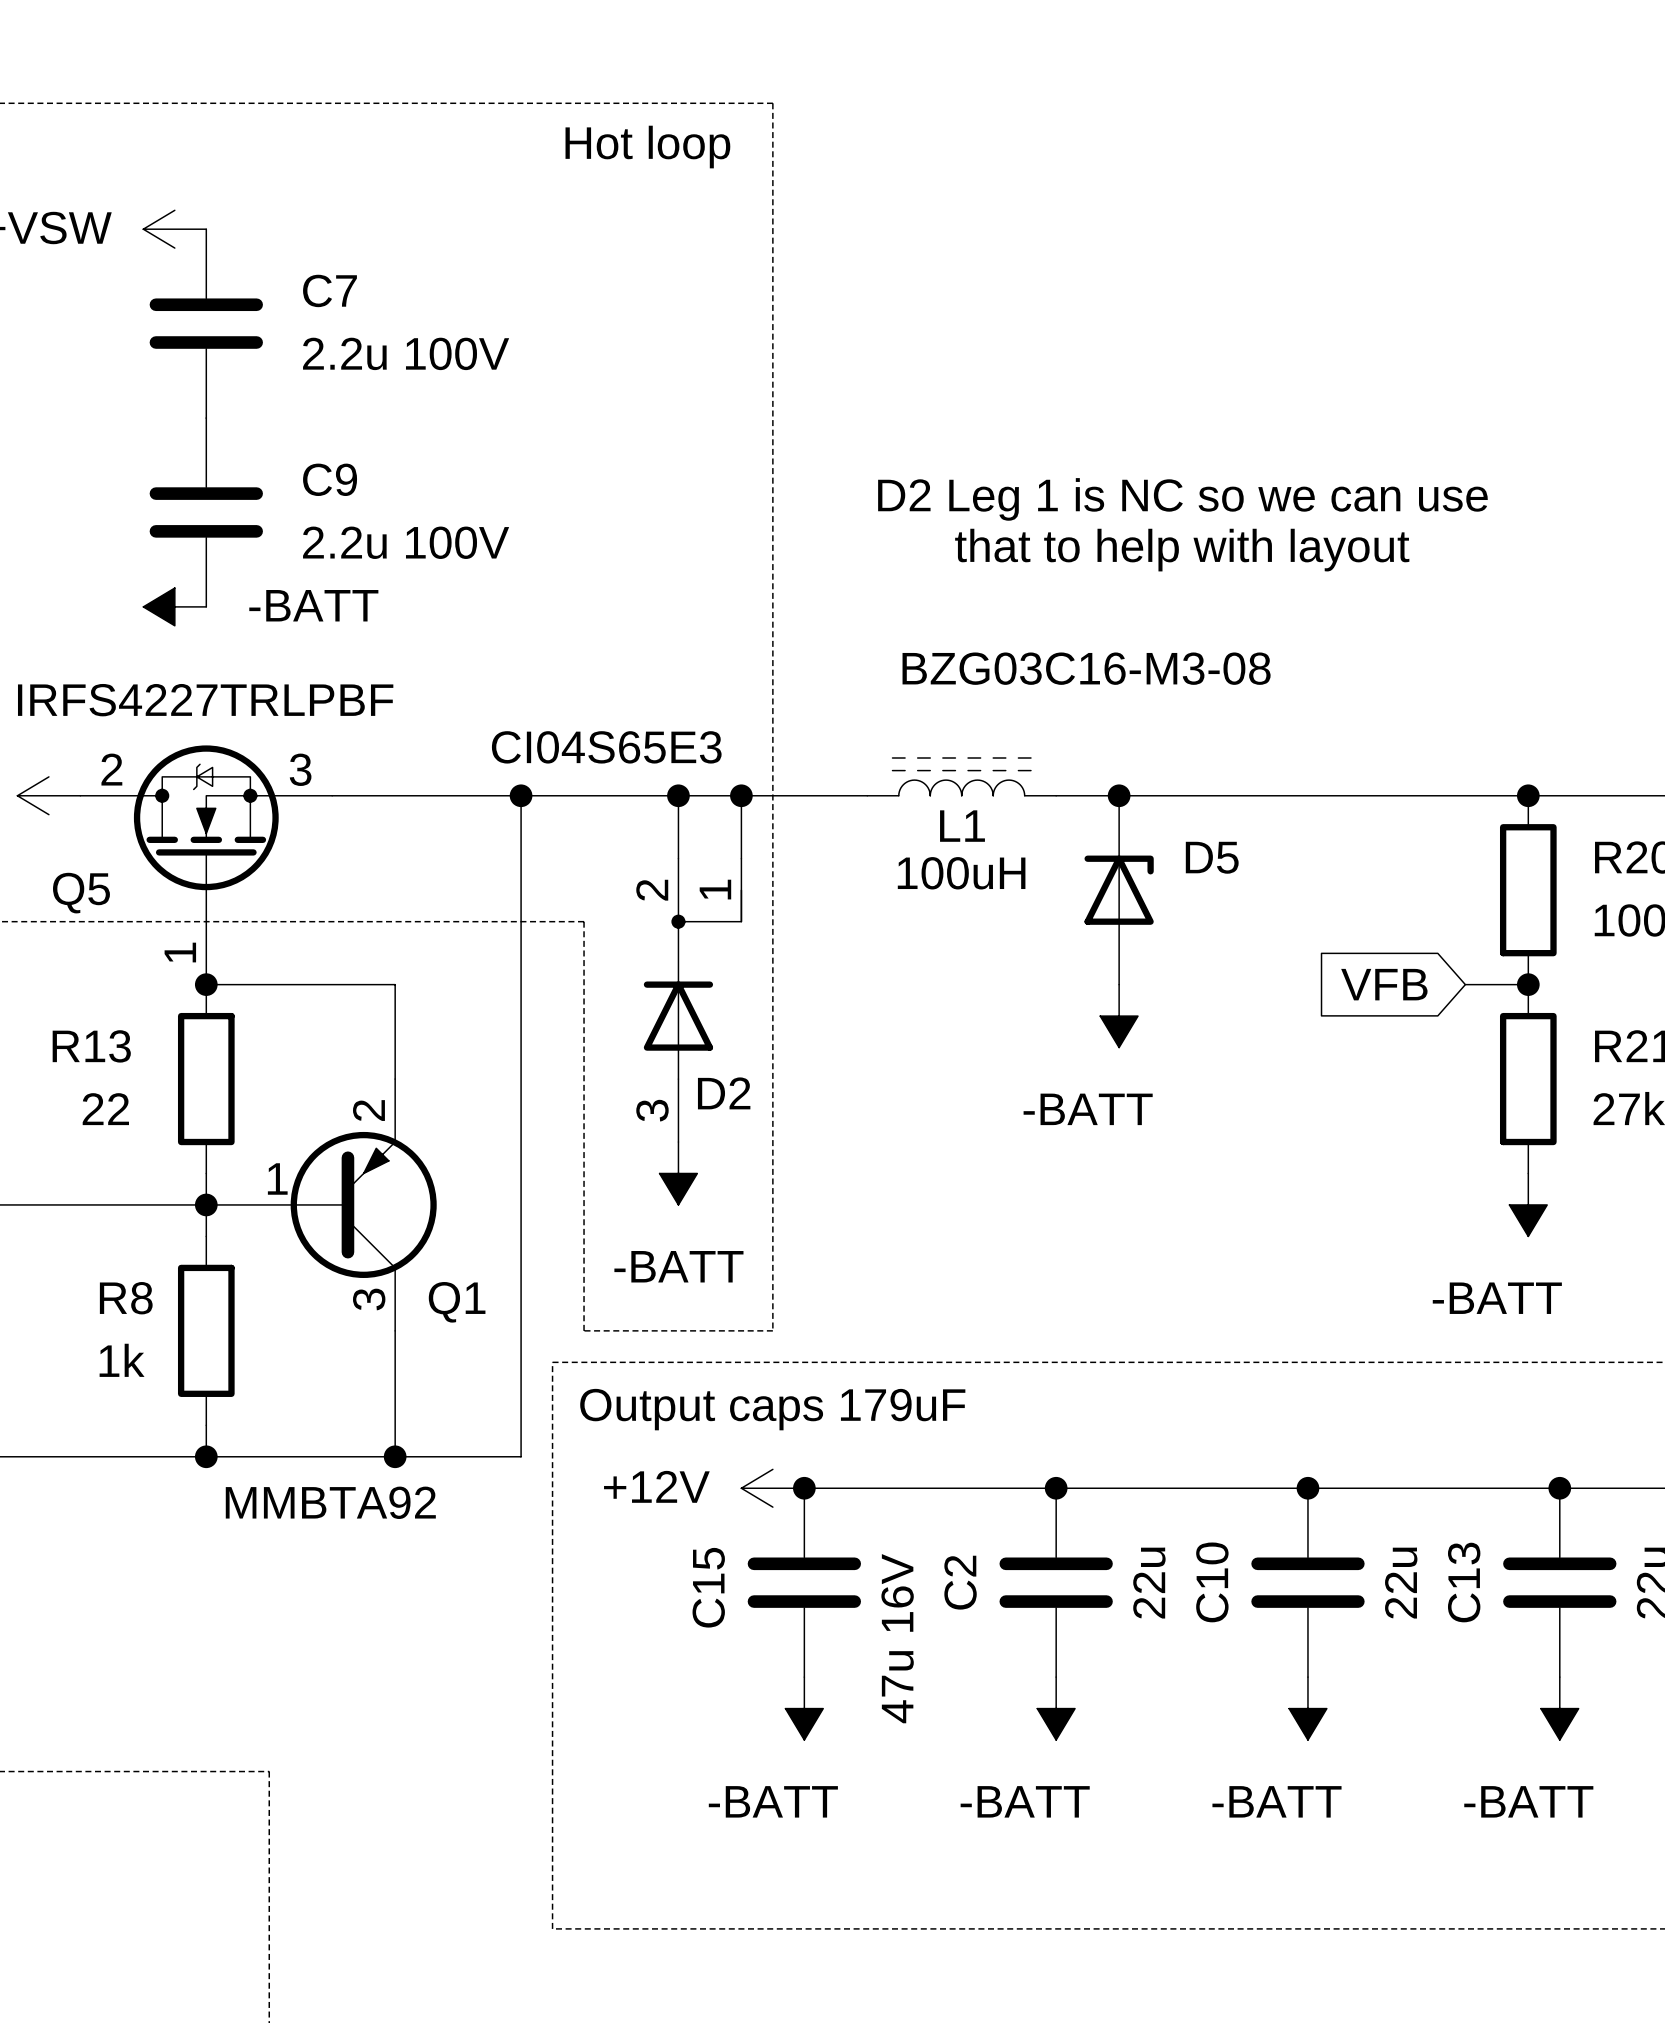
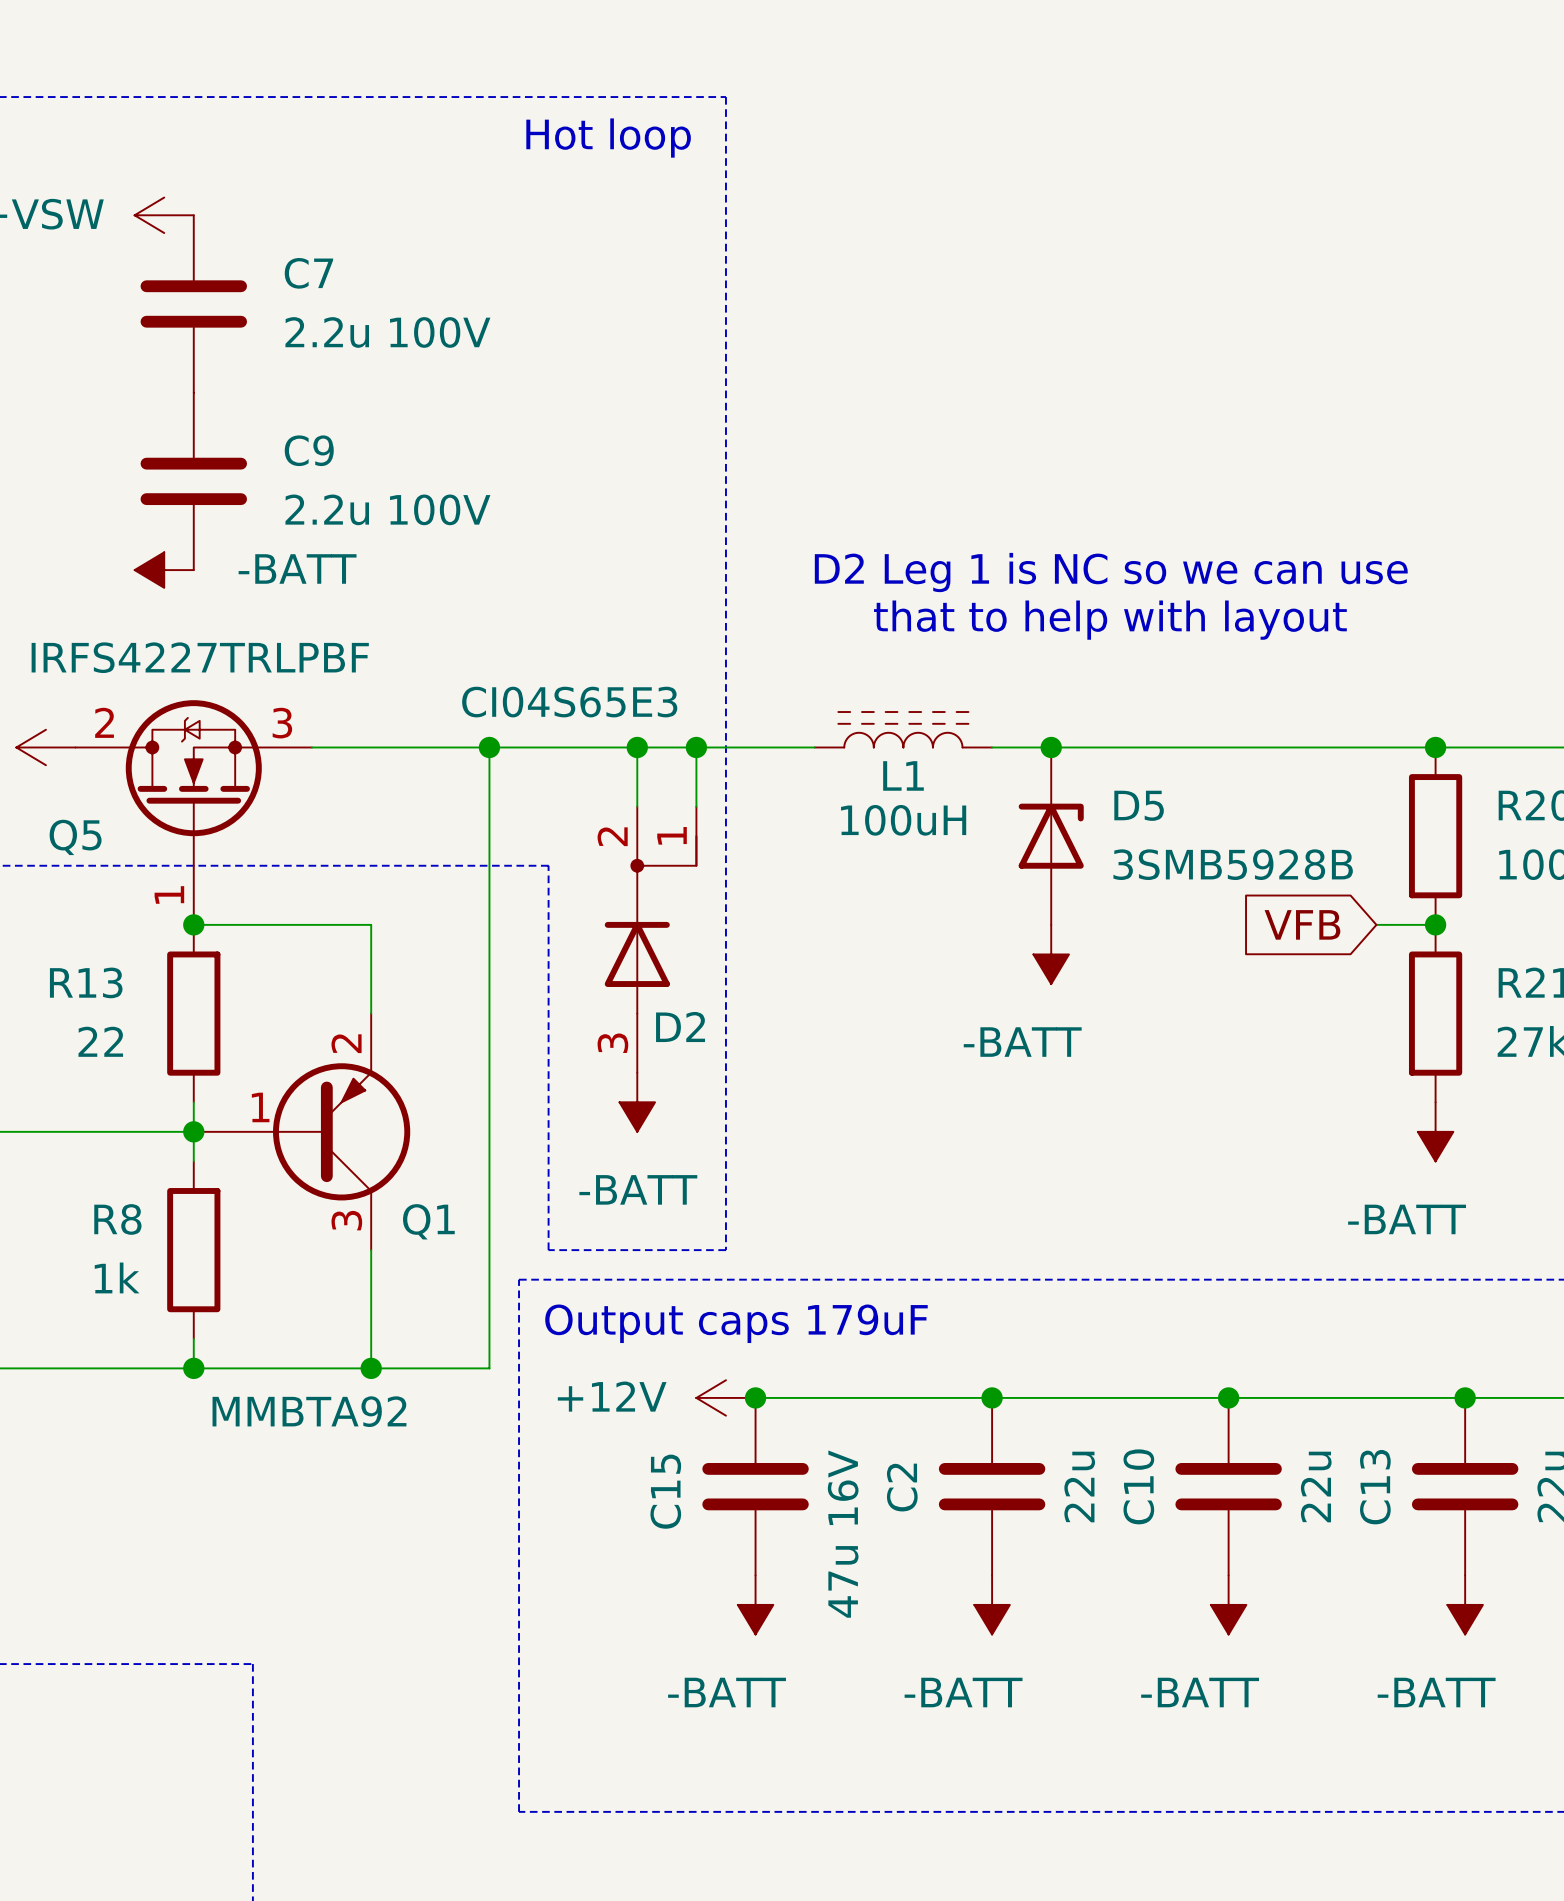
text position: D2 Leg 1 is NC so we can use (1182, 499) -> D2 Leg 1 is NC so we can use (1111, 572)
text position: that to help with layout (1182, 550) -> that to help with layout (1110, 620)
D5 value: BZG03C16-M3-08 (1086, 668) -> 3SMB5928B (1233, 864)

